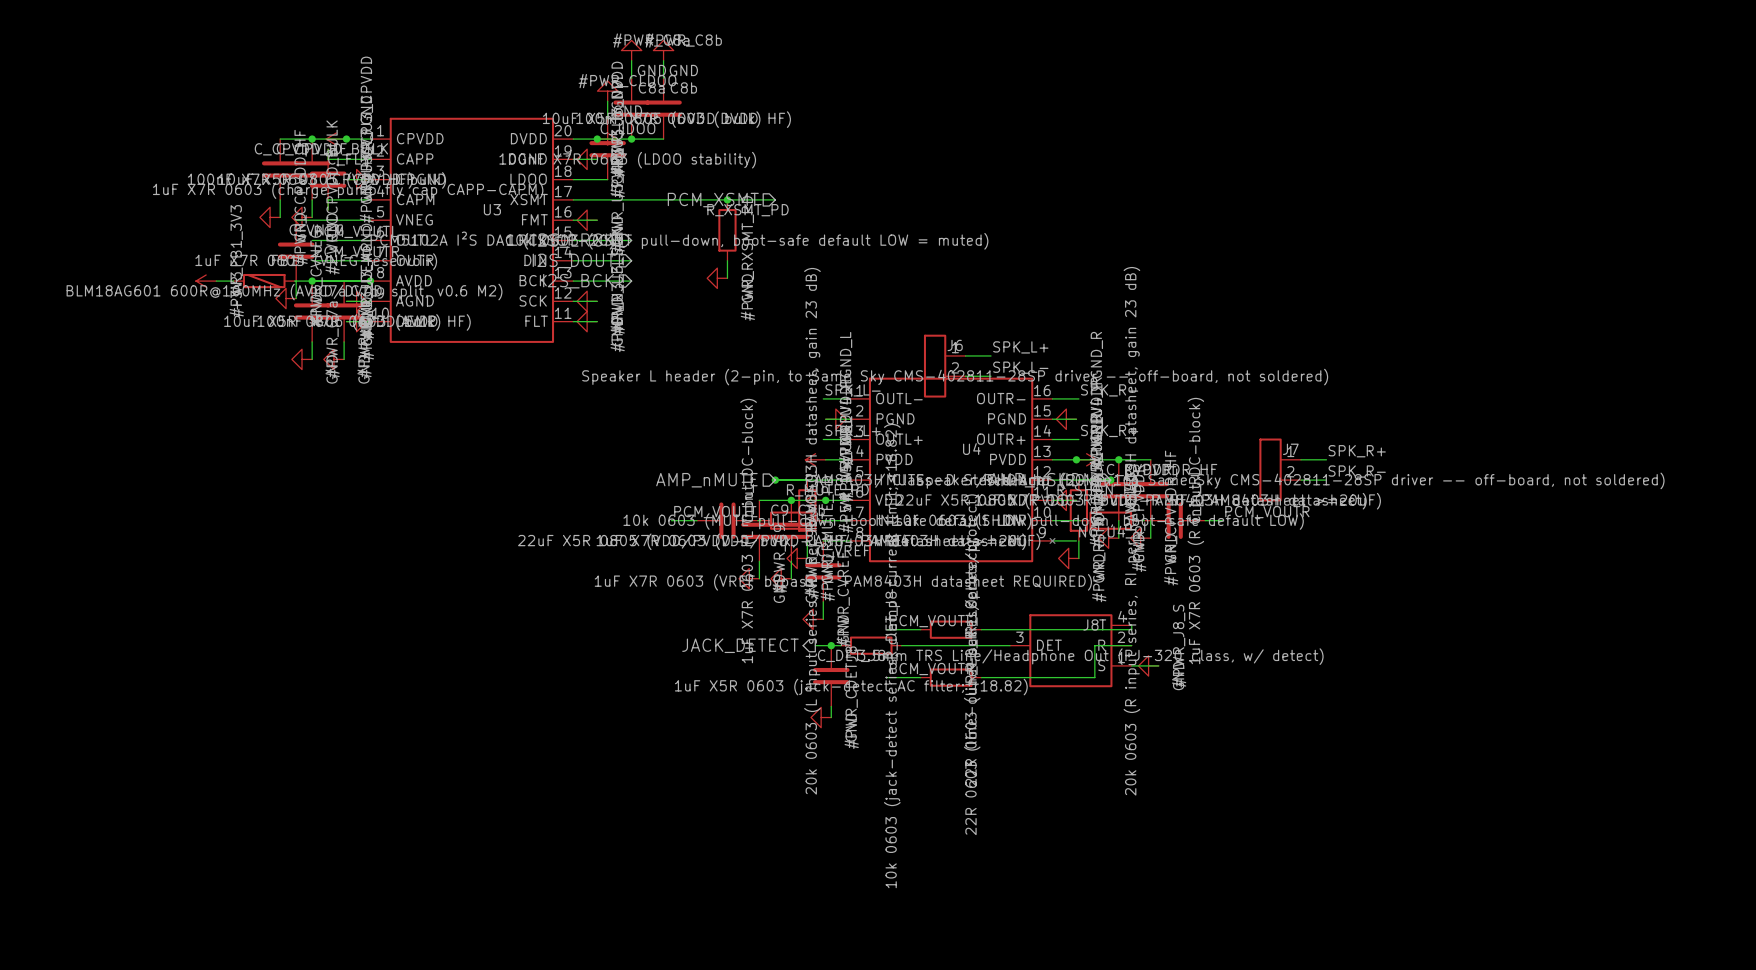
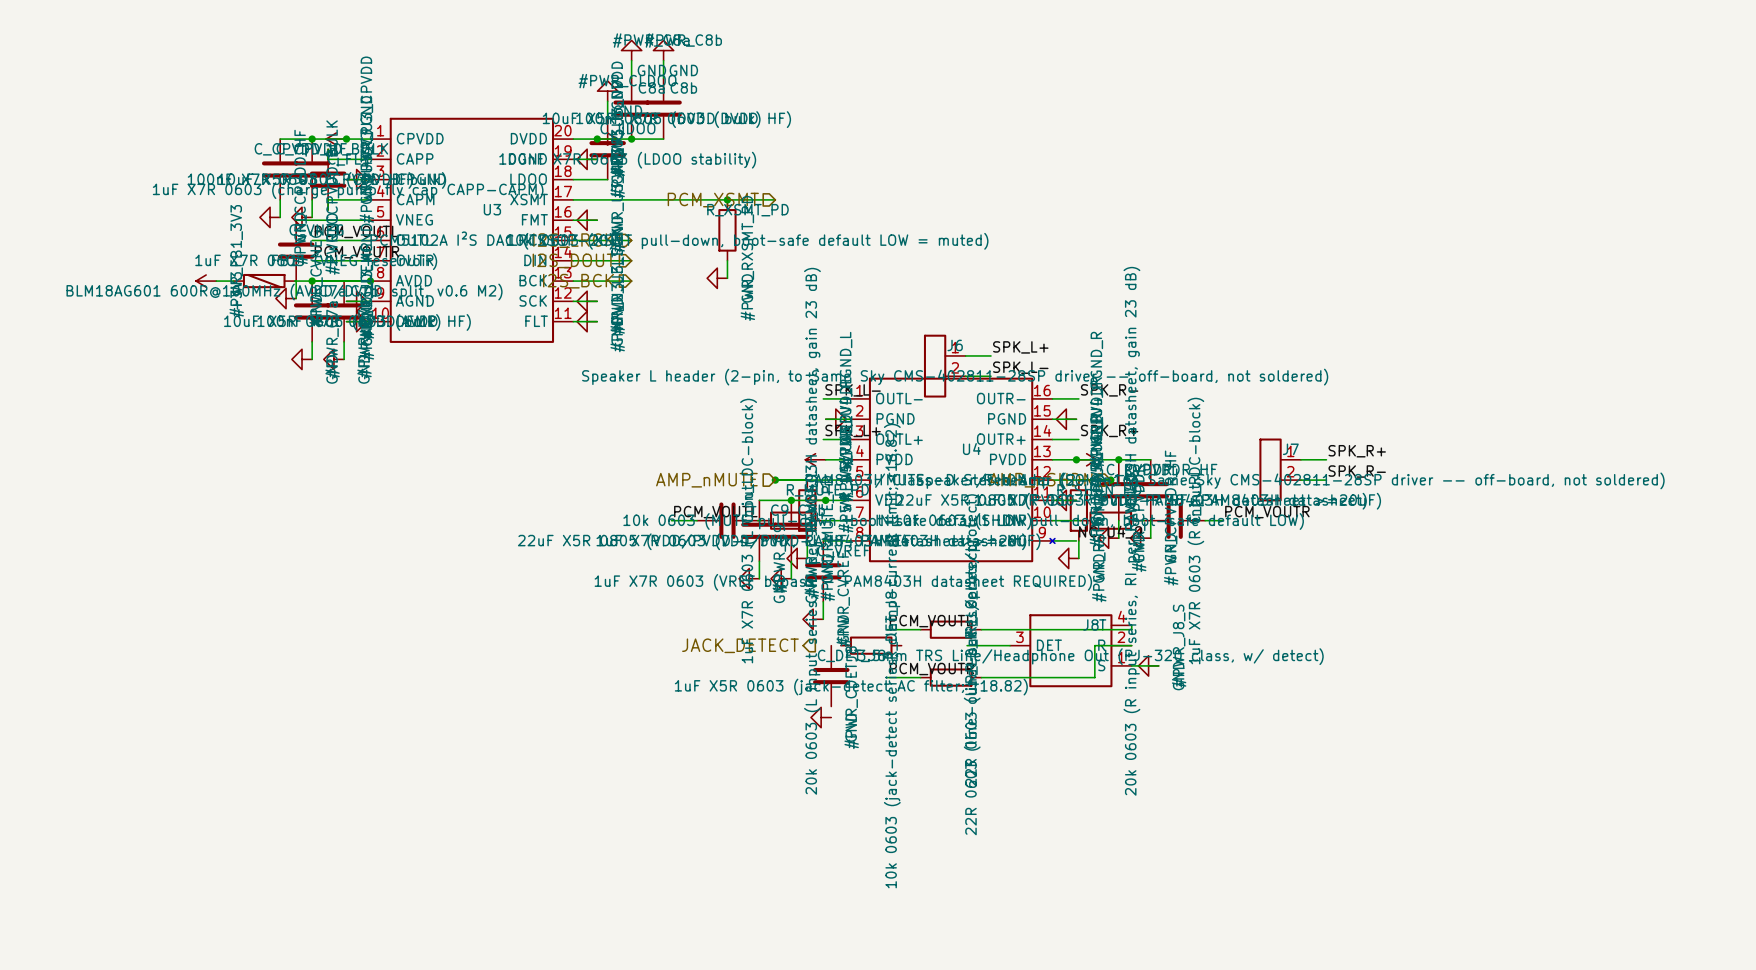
wire: (815, 645) (840, 645) -> none
junction: (831, 645) -> none
wire: (901, 645) (967, 645) -> none
wire: (831, 706) (831, 717) -> none

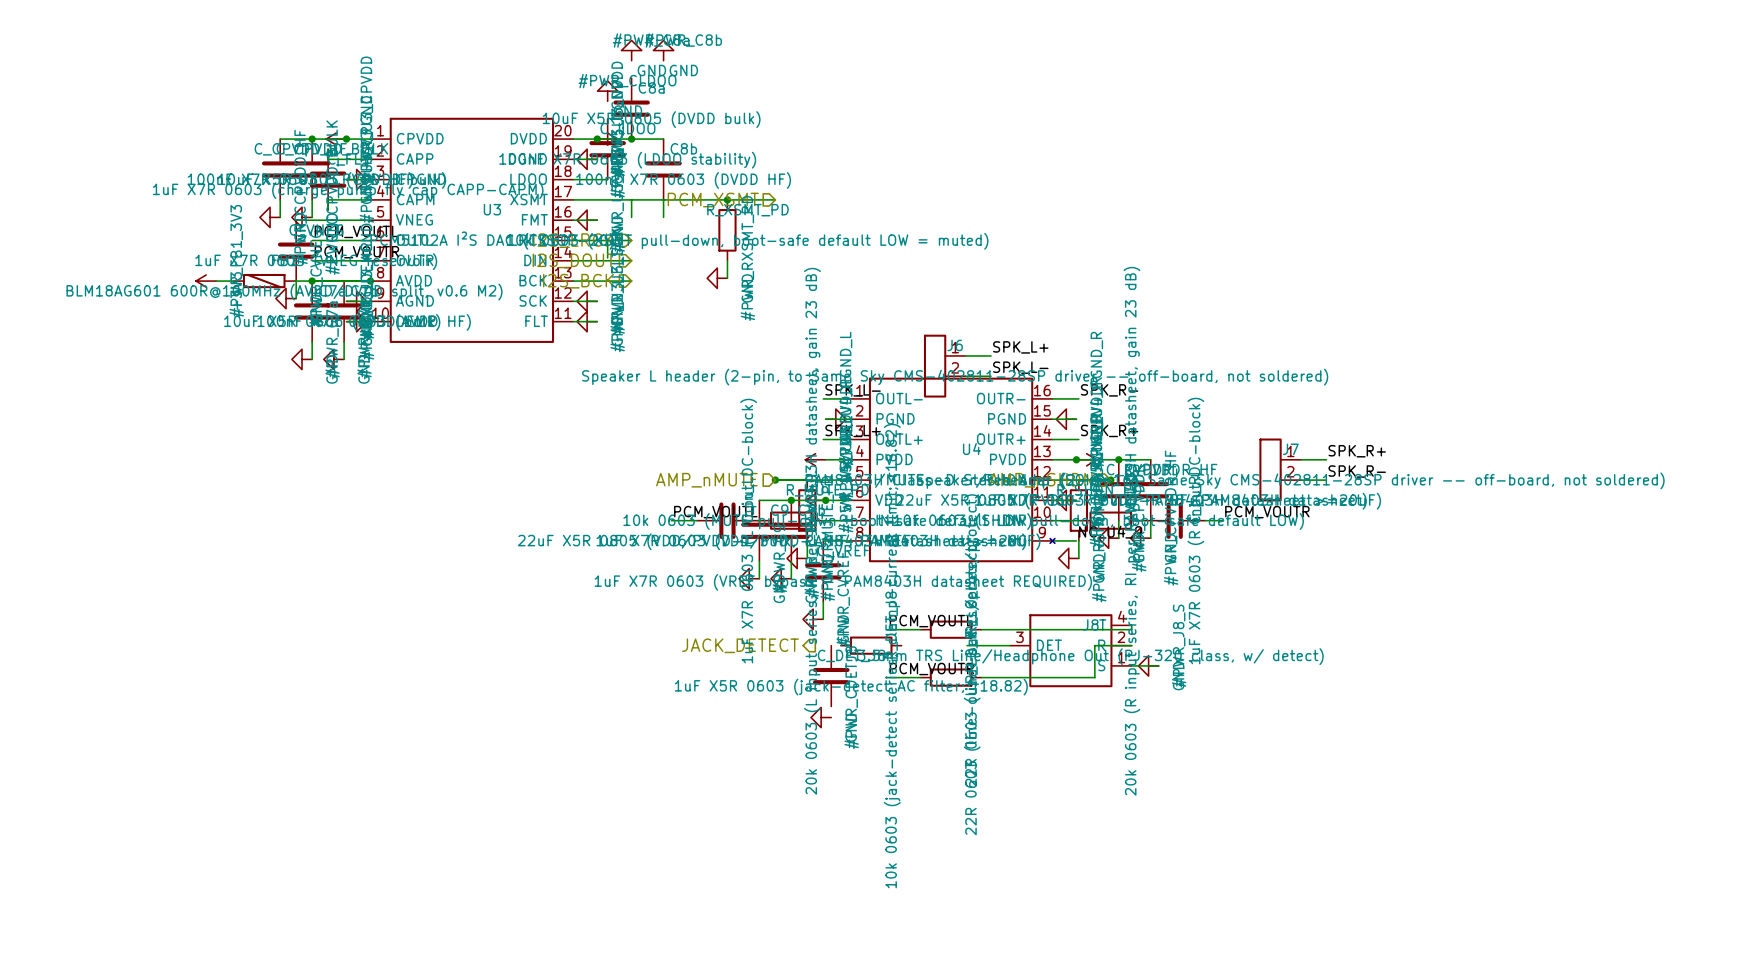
wire: (631, 60) (631, 78) -> (631, 199) (631, 217)
wire: (663, 60) (663, 78) -> (663, 199) (663, 217)
wire: (607, 101) (607, 118) -> (607, 240) (607, 257)
C8b position: (663, 108) -> (663, 169)

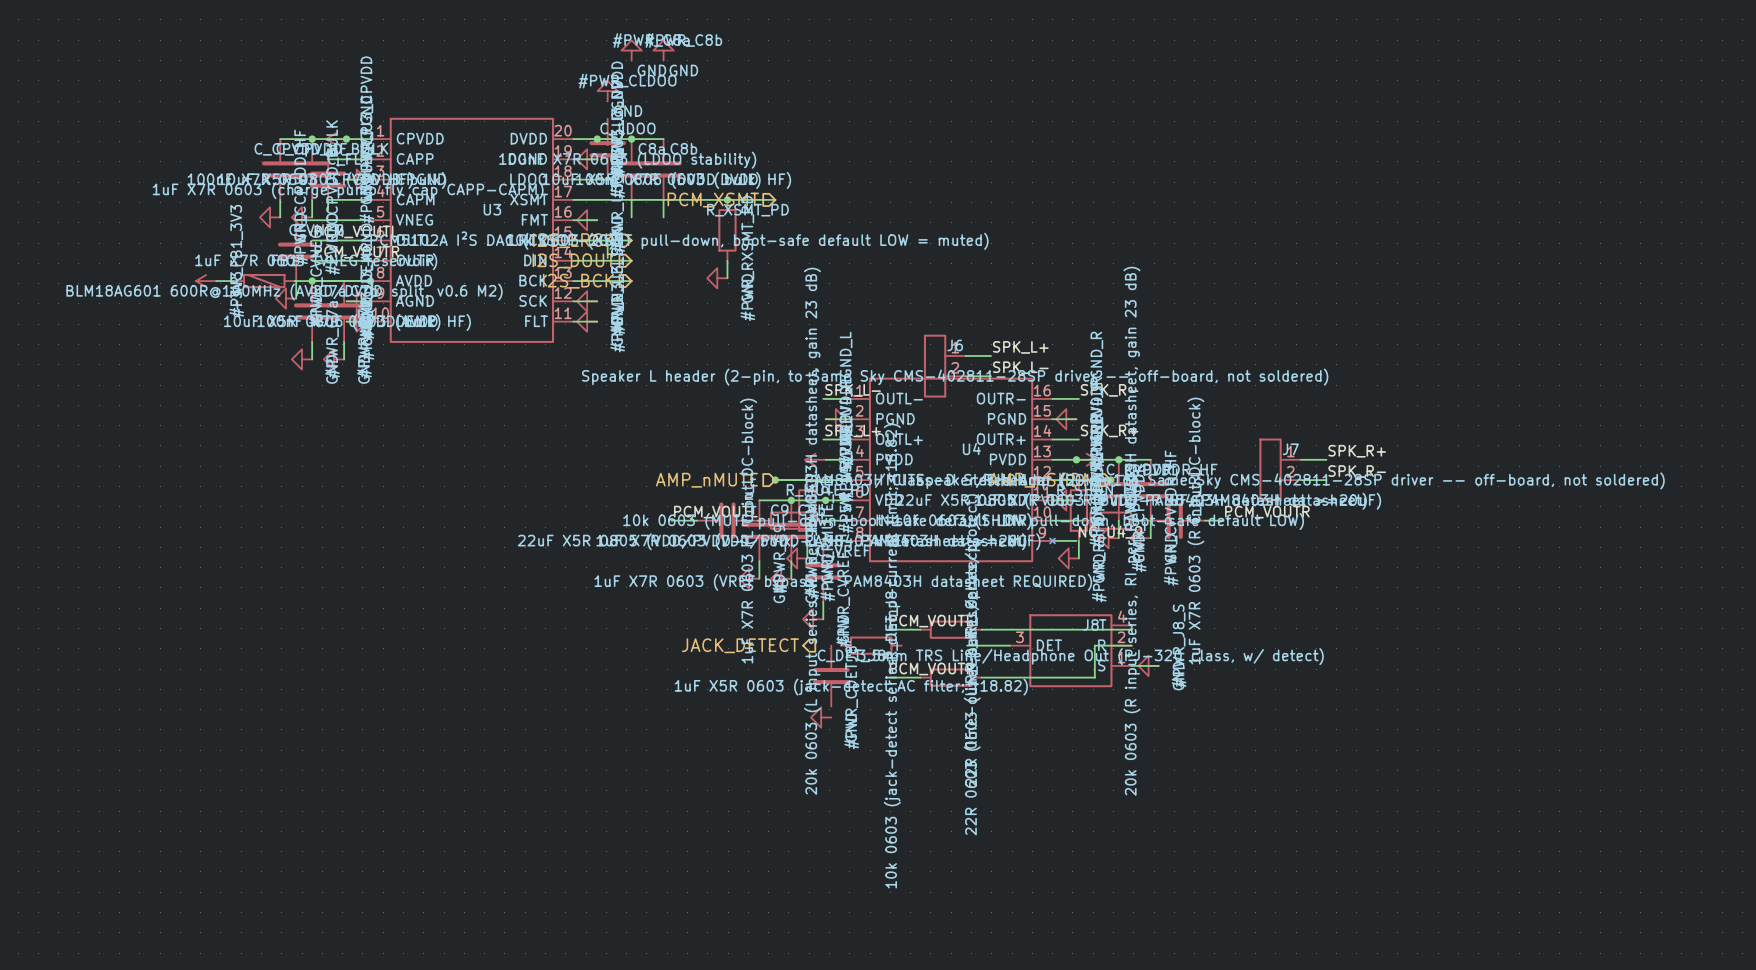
C8a position: (631, 108) -> (631, 169)

